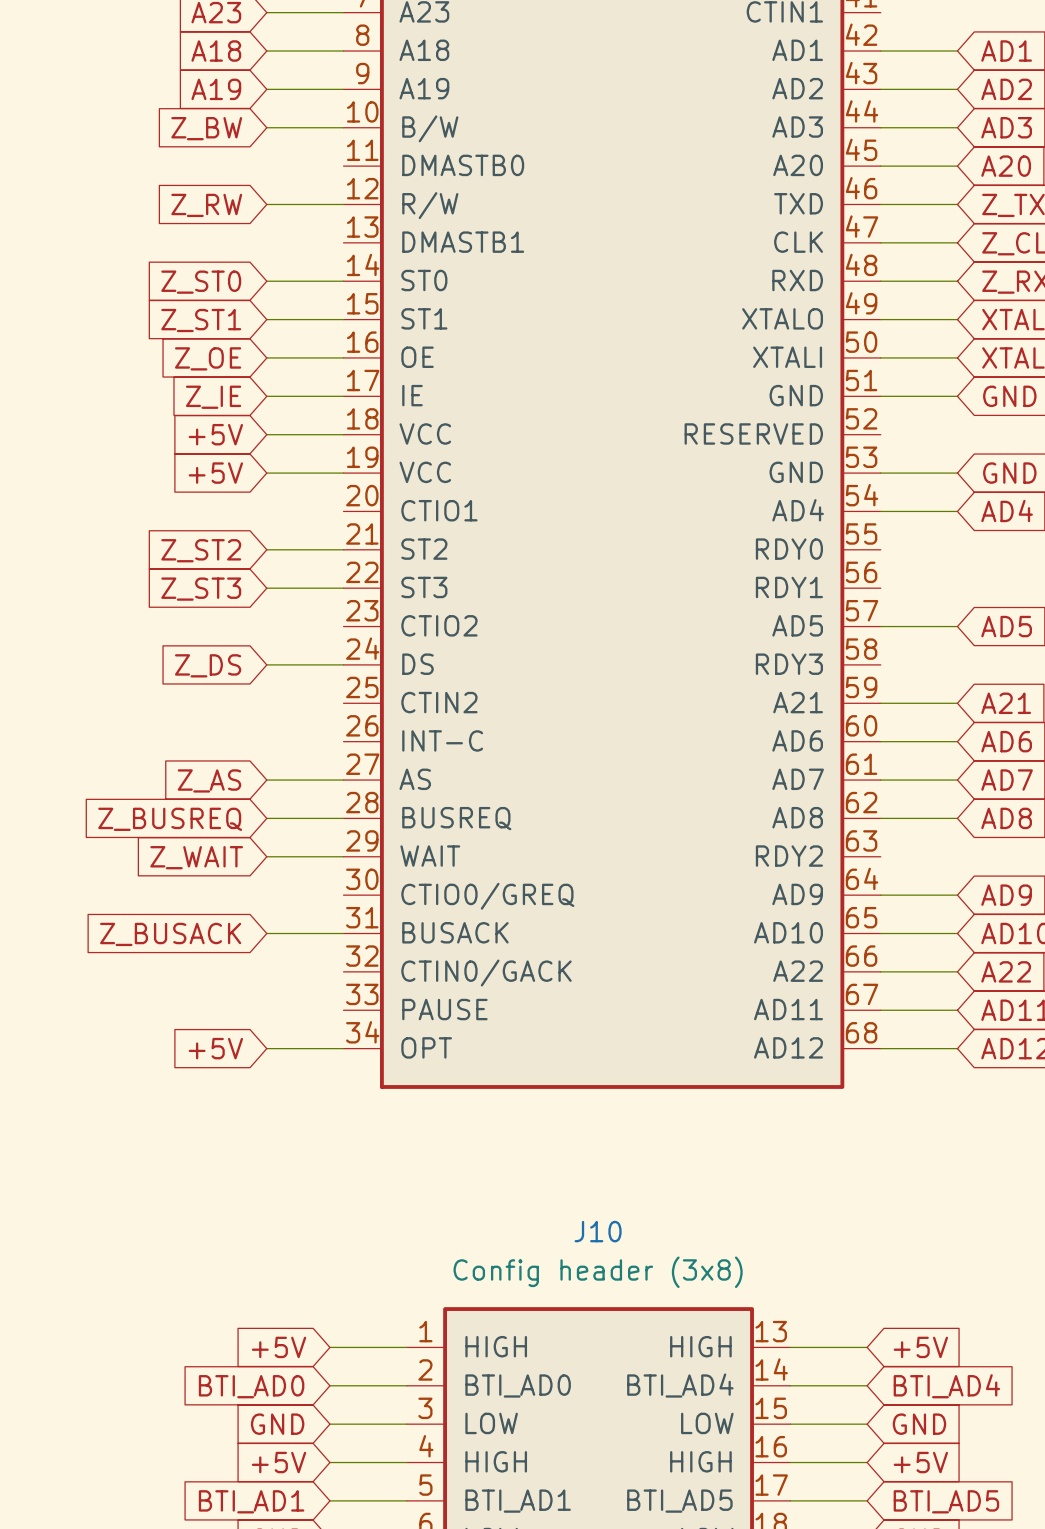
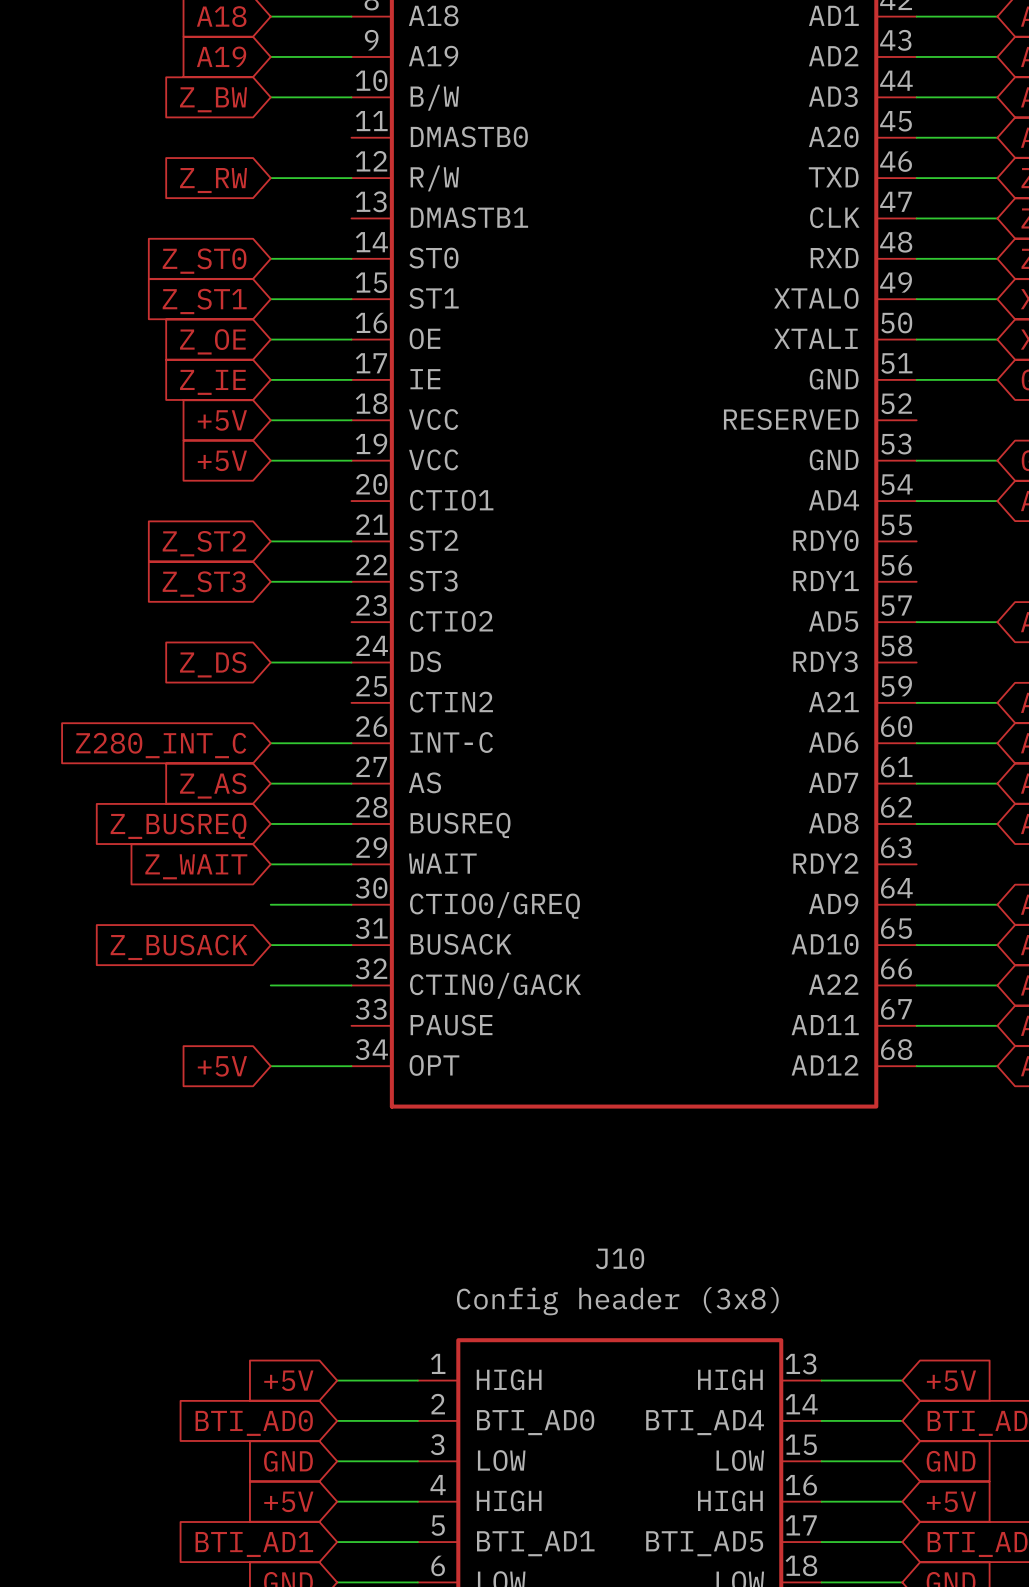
wire: none -> (270, 743) (351, 743)
global label: none -> Z280_INT_C (161, 745)
wire: none -> (270, 904) (351, 904)
wire: none -> (270, 985) (351, 985)

